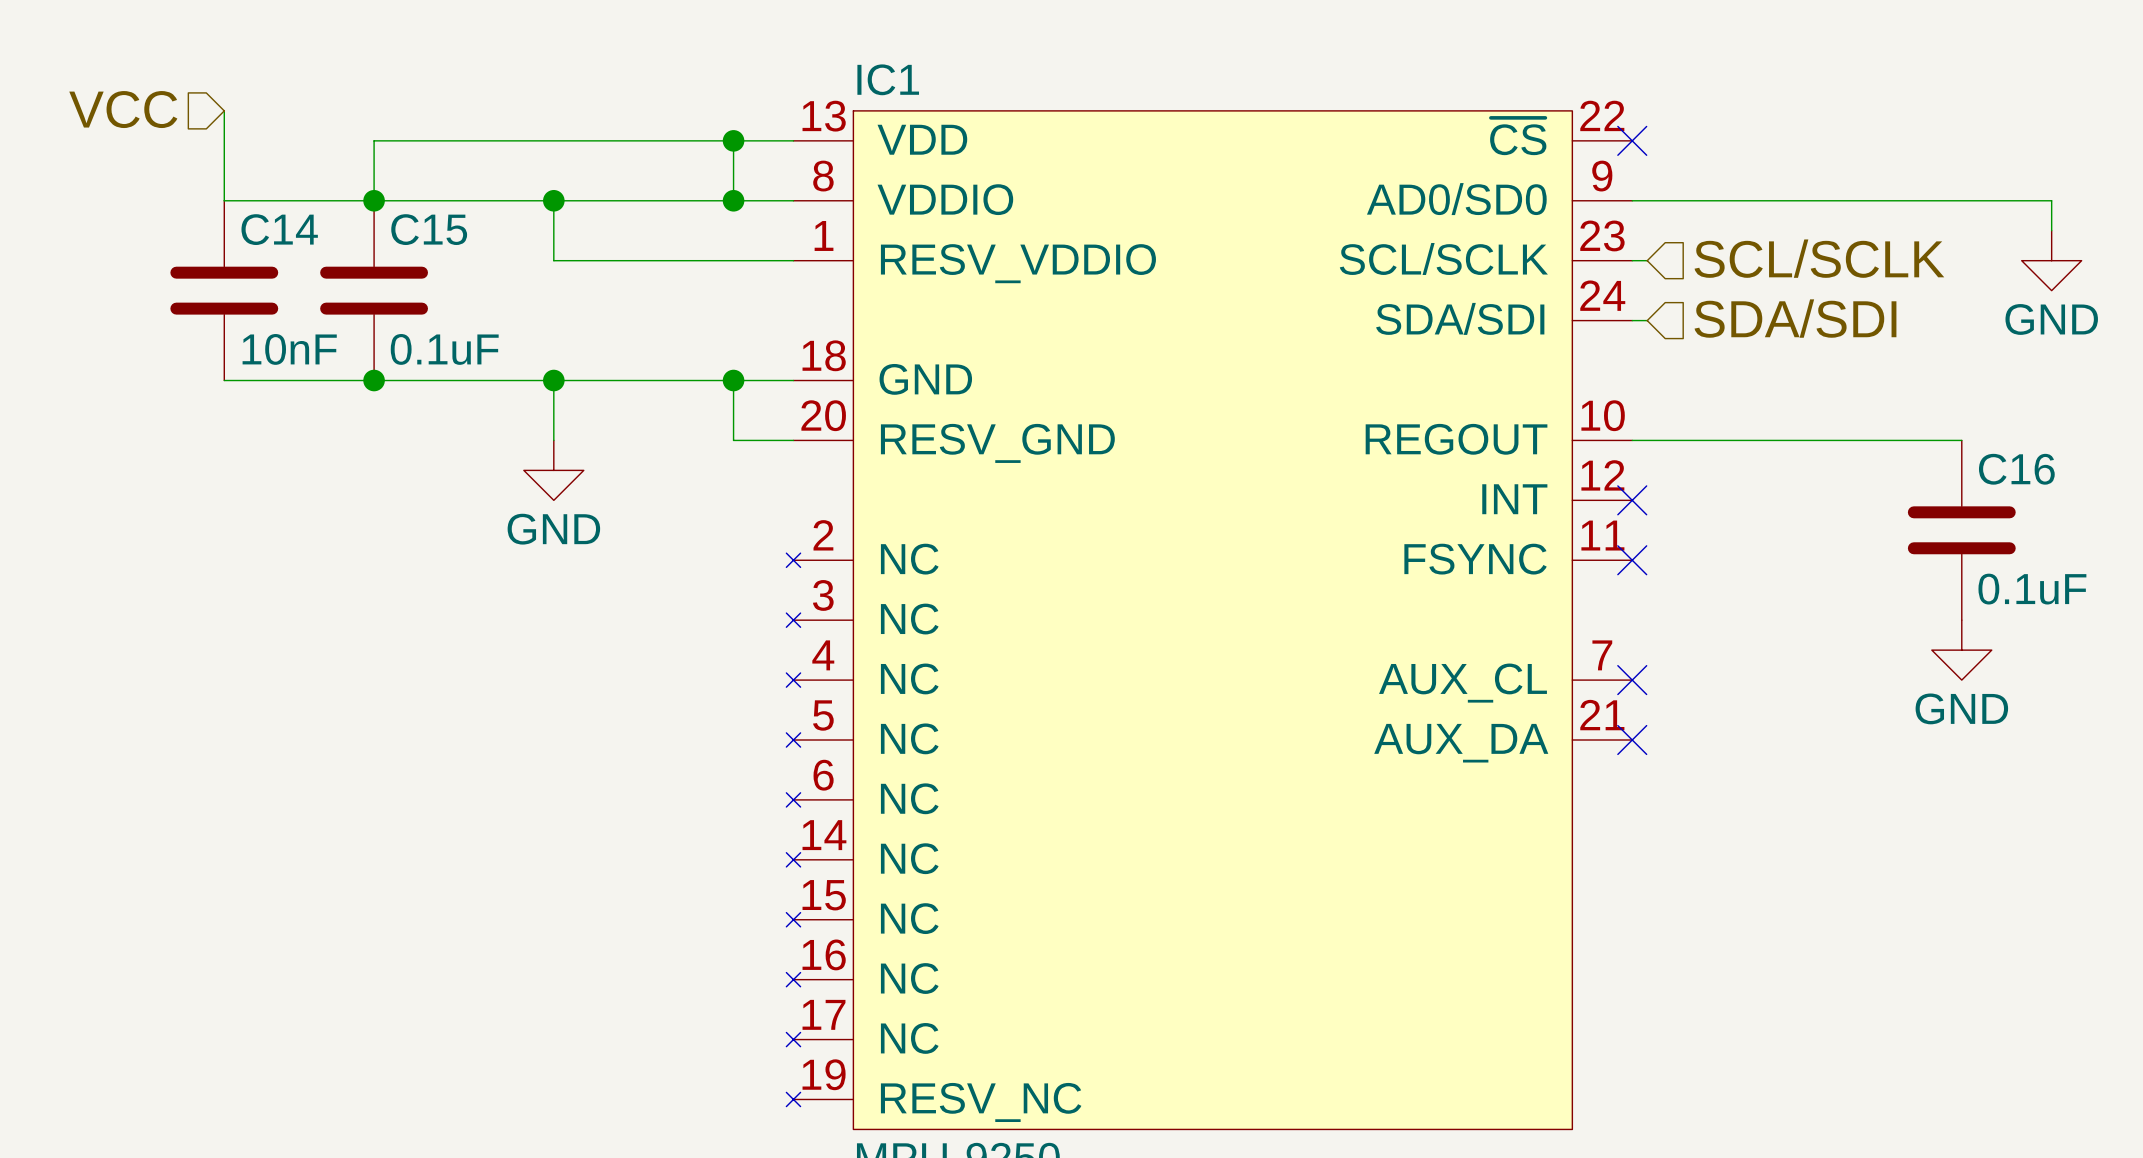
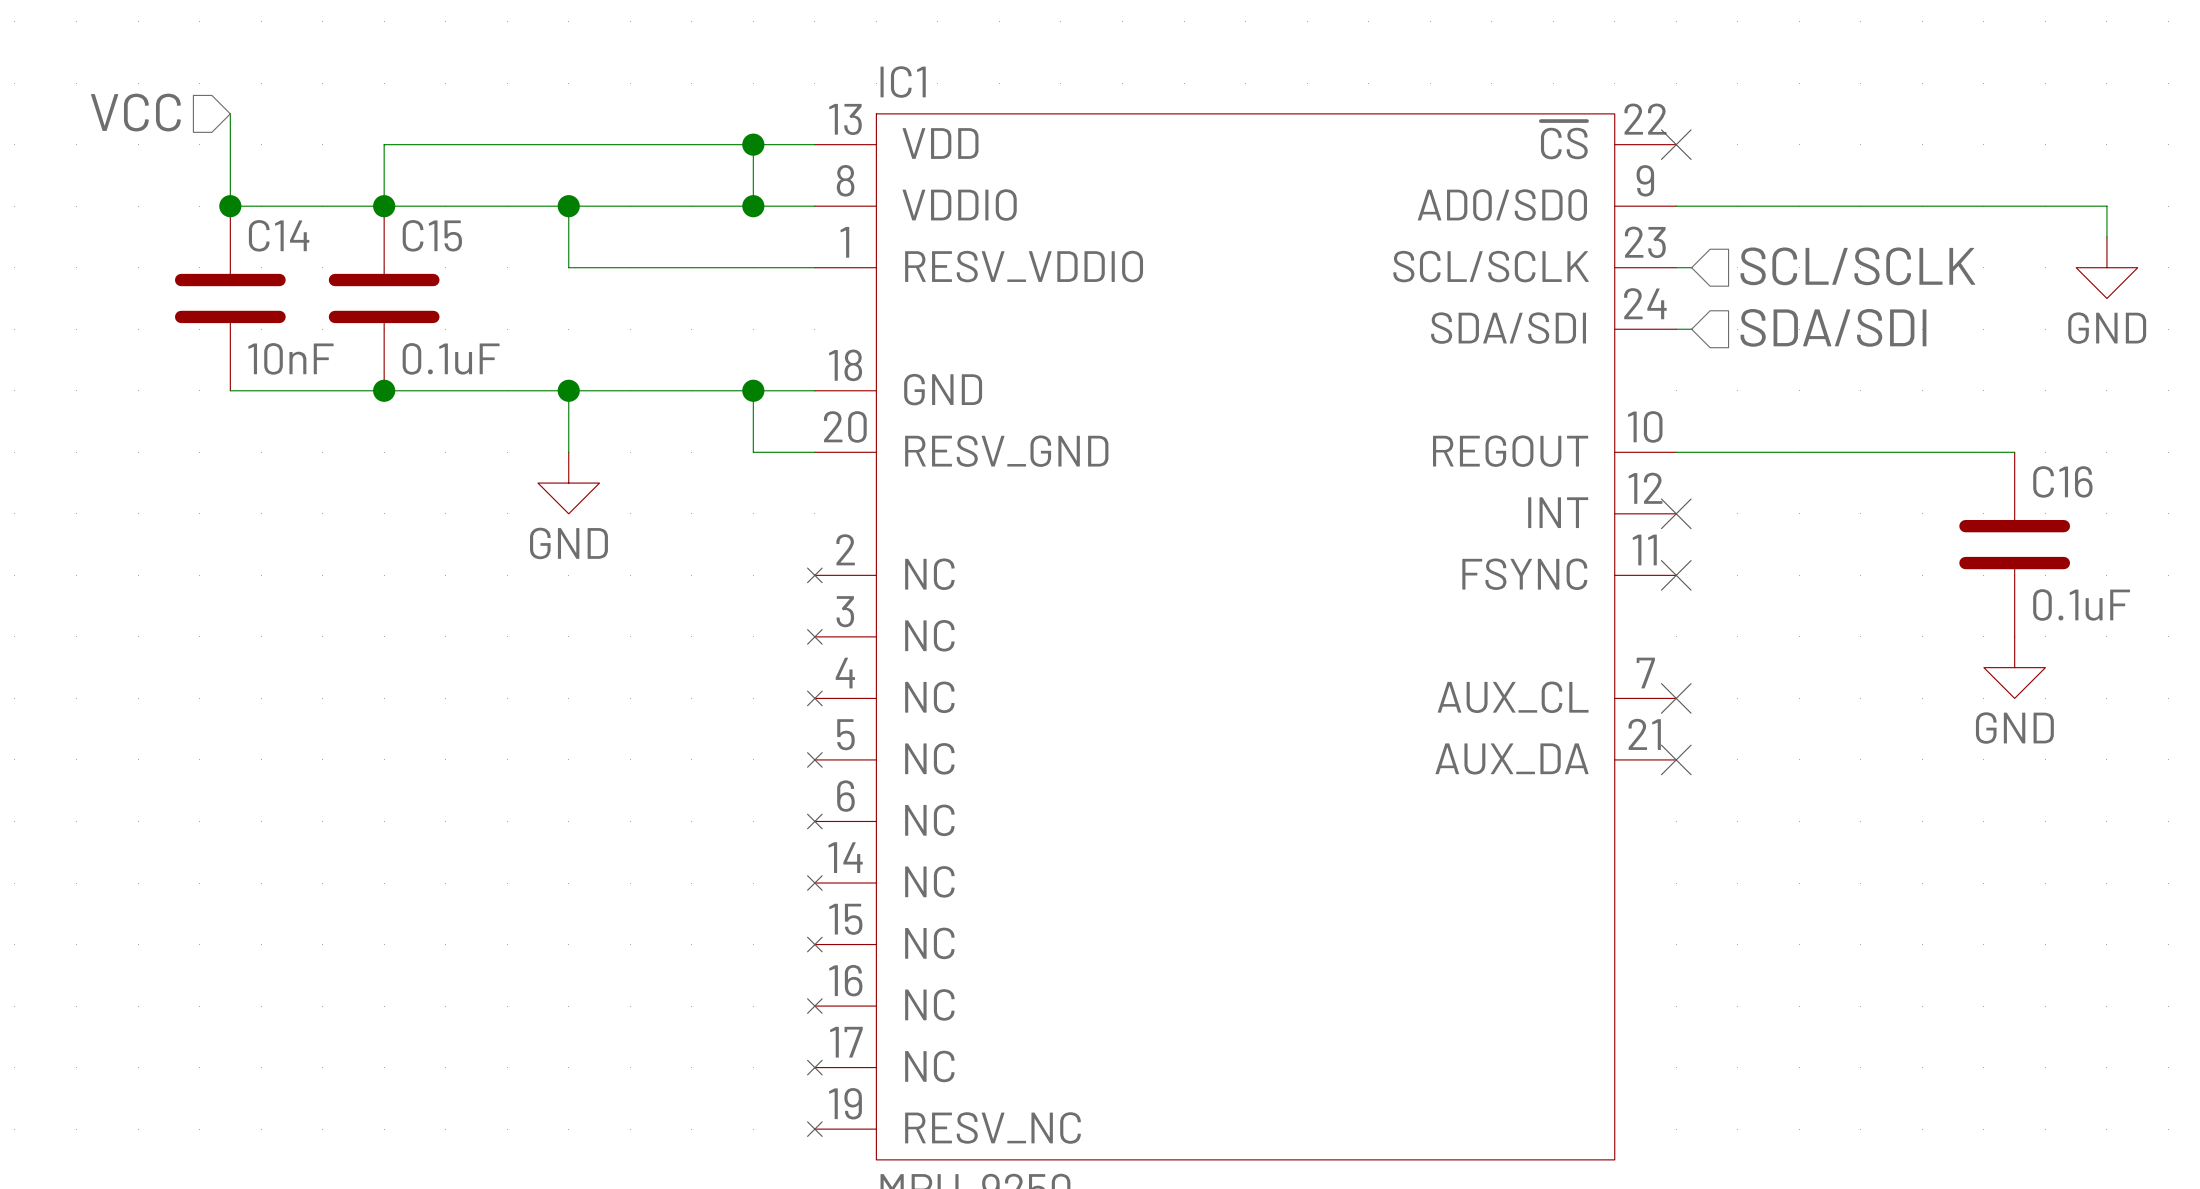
junction: none -> (230, 206)

